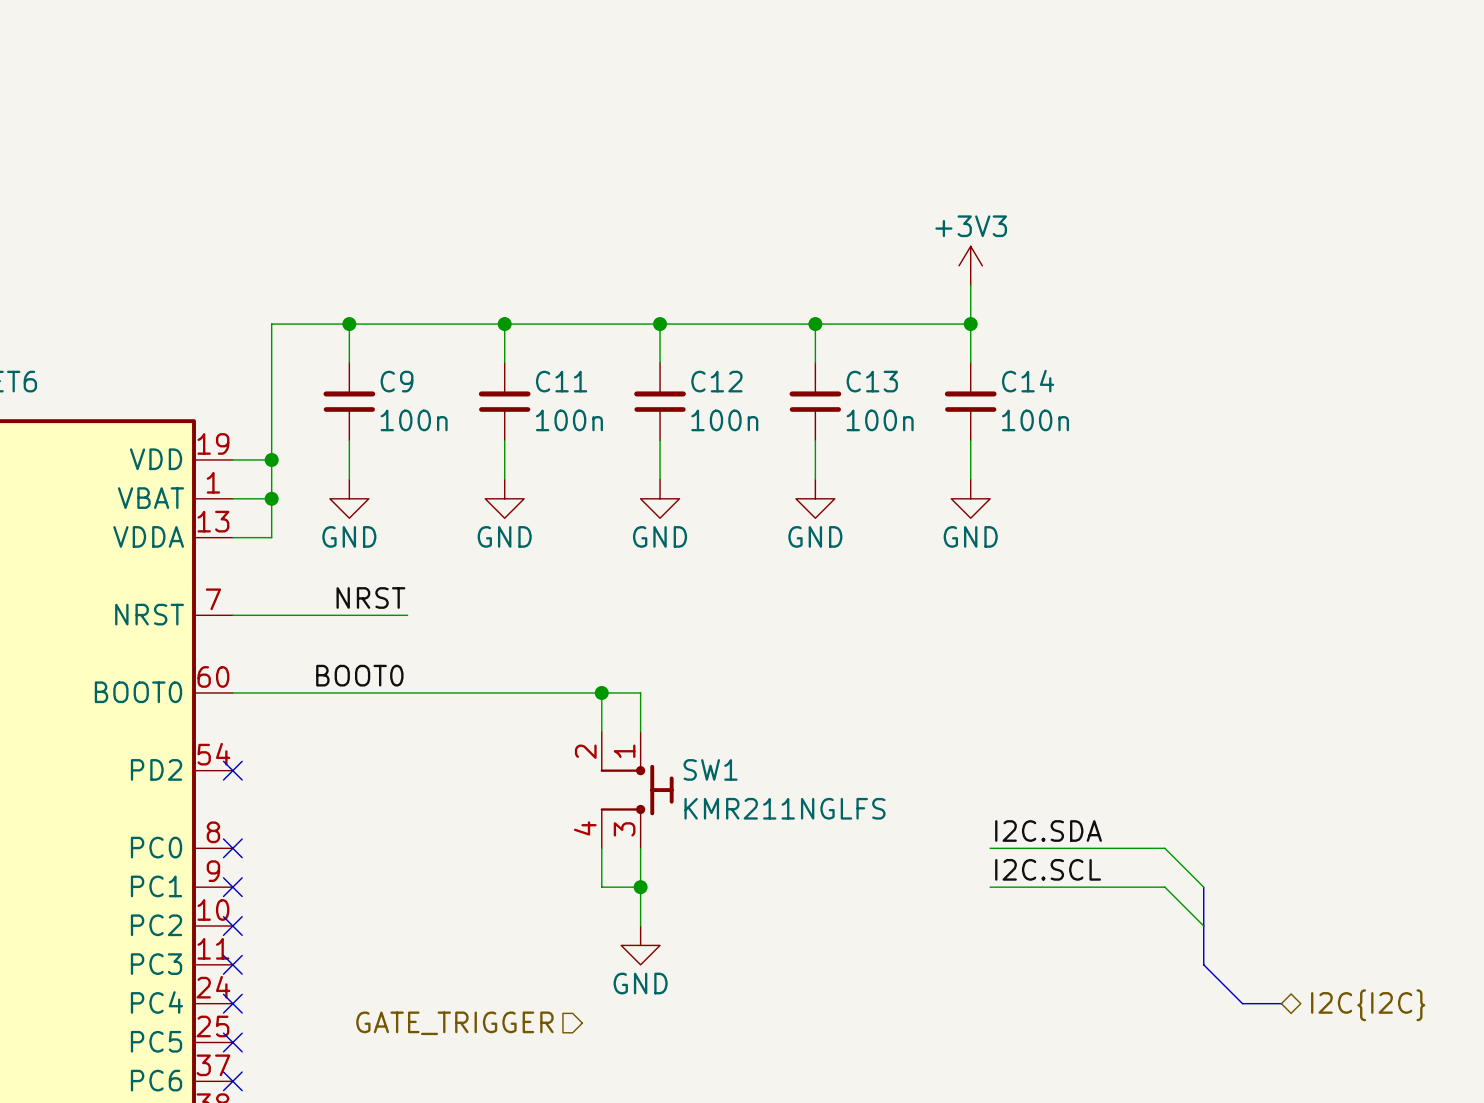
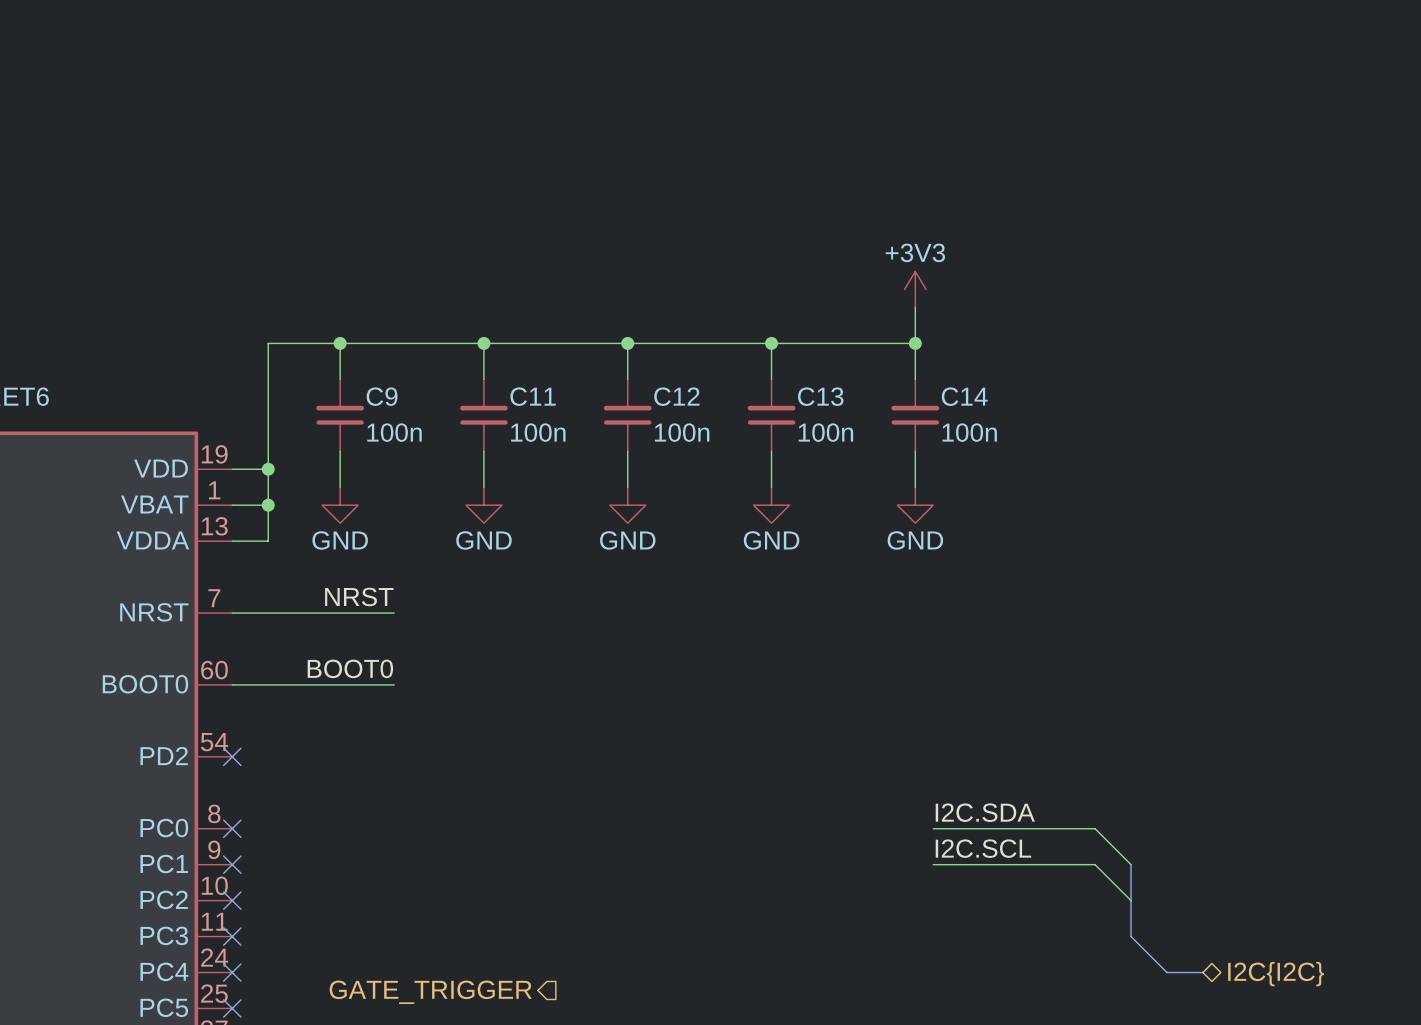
wire: (407, 692) (640, 692) (640, 731) -> none
wire: (601, 692) (601, 731) -> none
junction: (601, 692) -> none
SW1: (637, 790) -> none
wire: (601, 848) (601, 887) (640, 887) -> none
wire: (640, 848) (640, 926) -> none
junction: (640, 887) -> none
power symbol: GND (640, 945) -> none
hierarchical label shape: input (454, 1023) -> output (430, 992)

